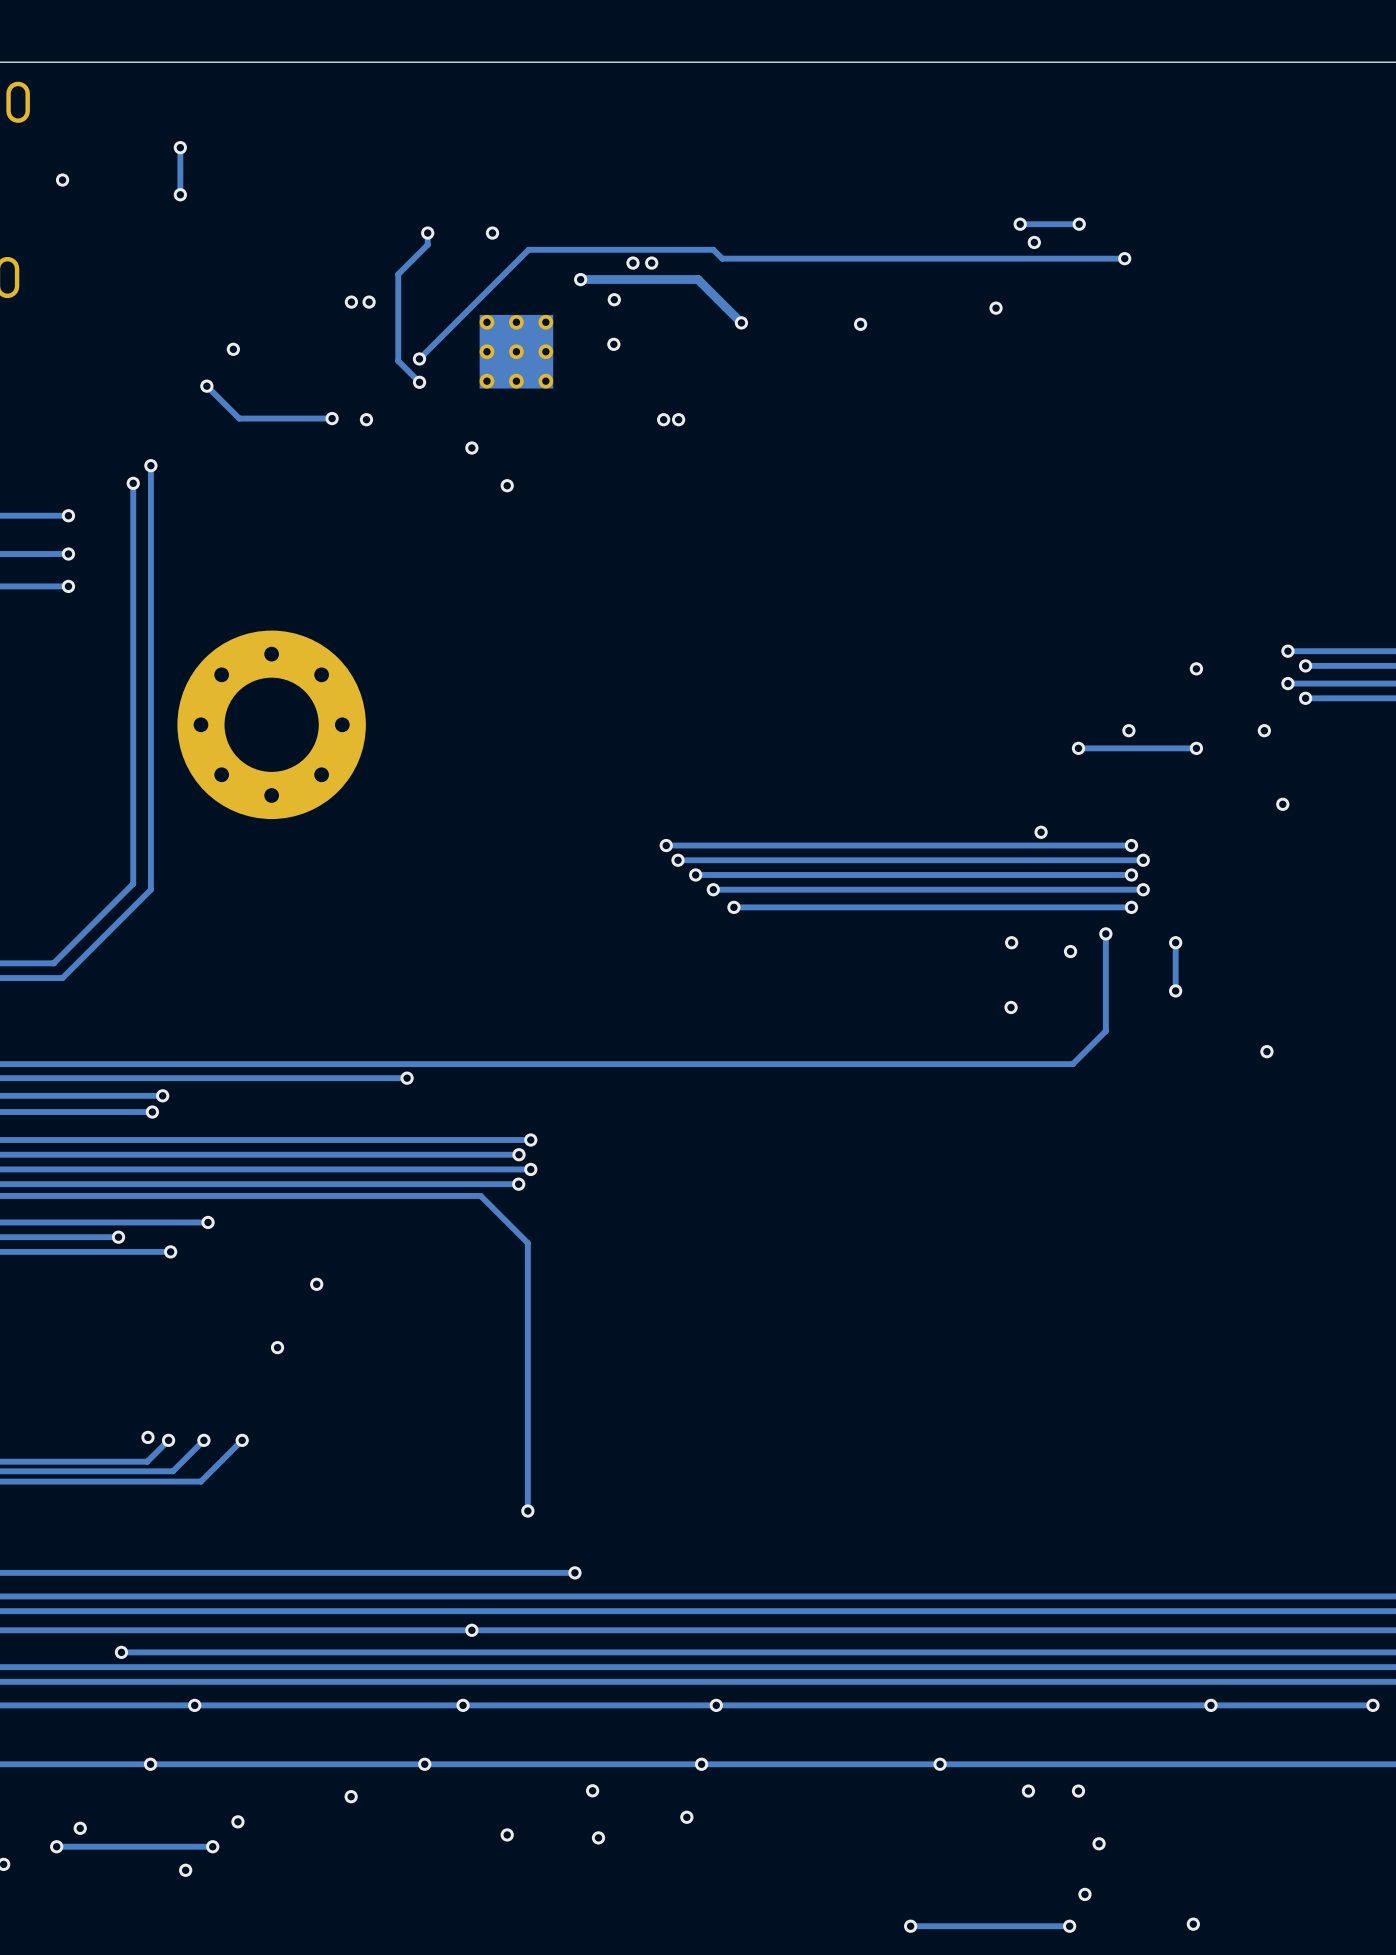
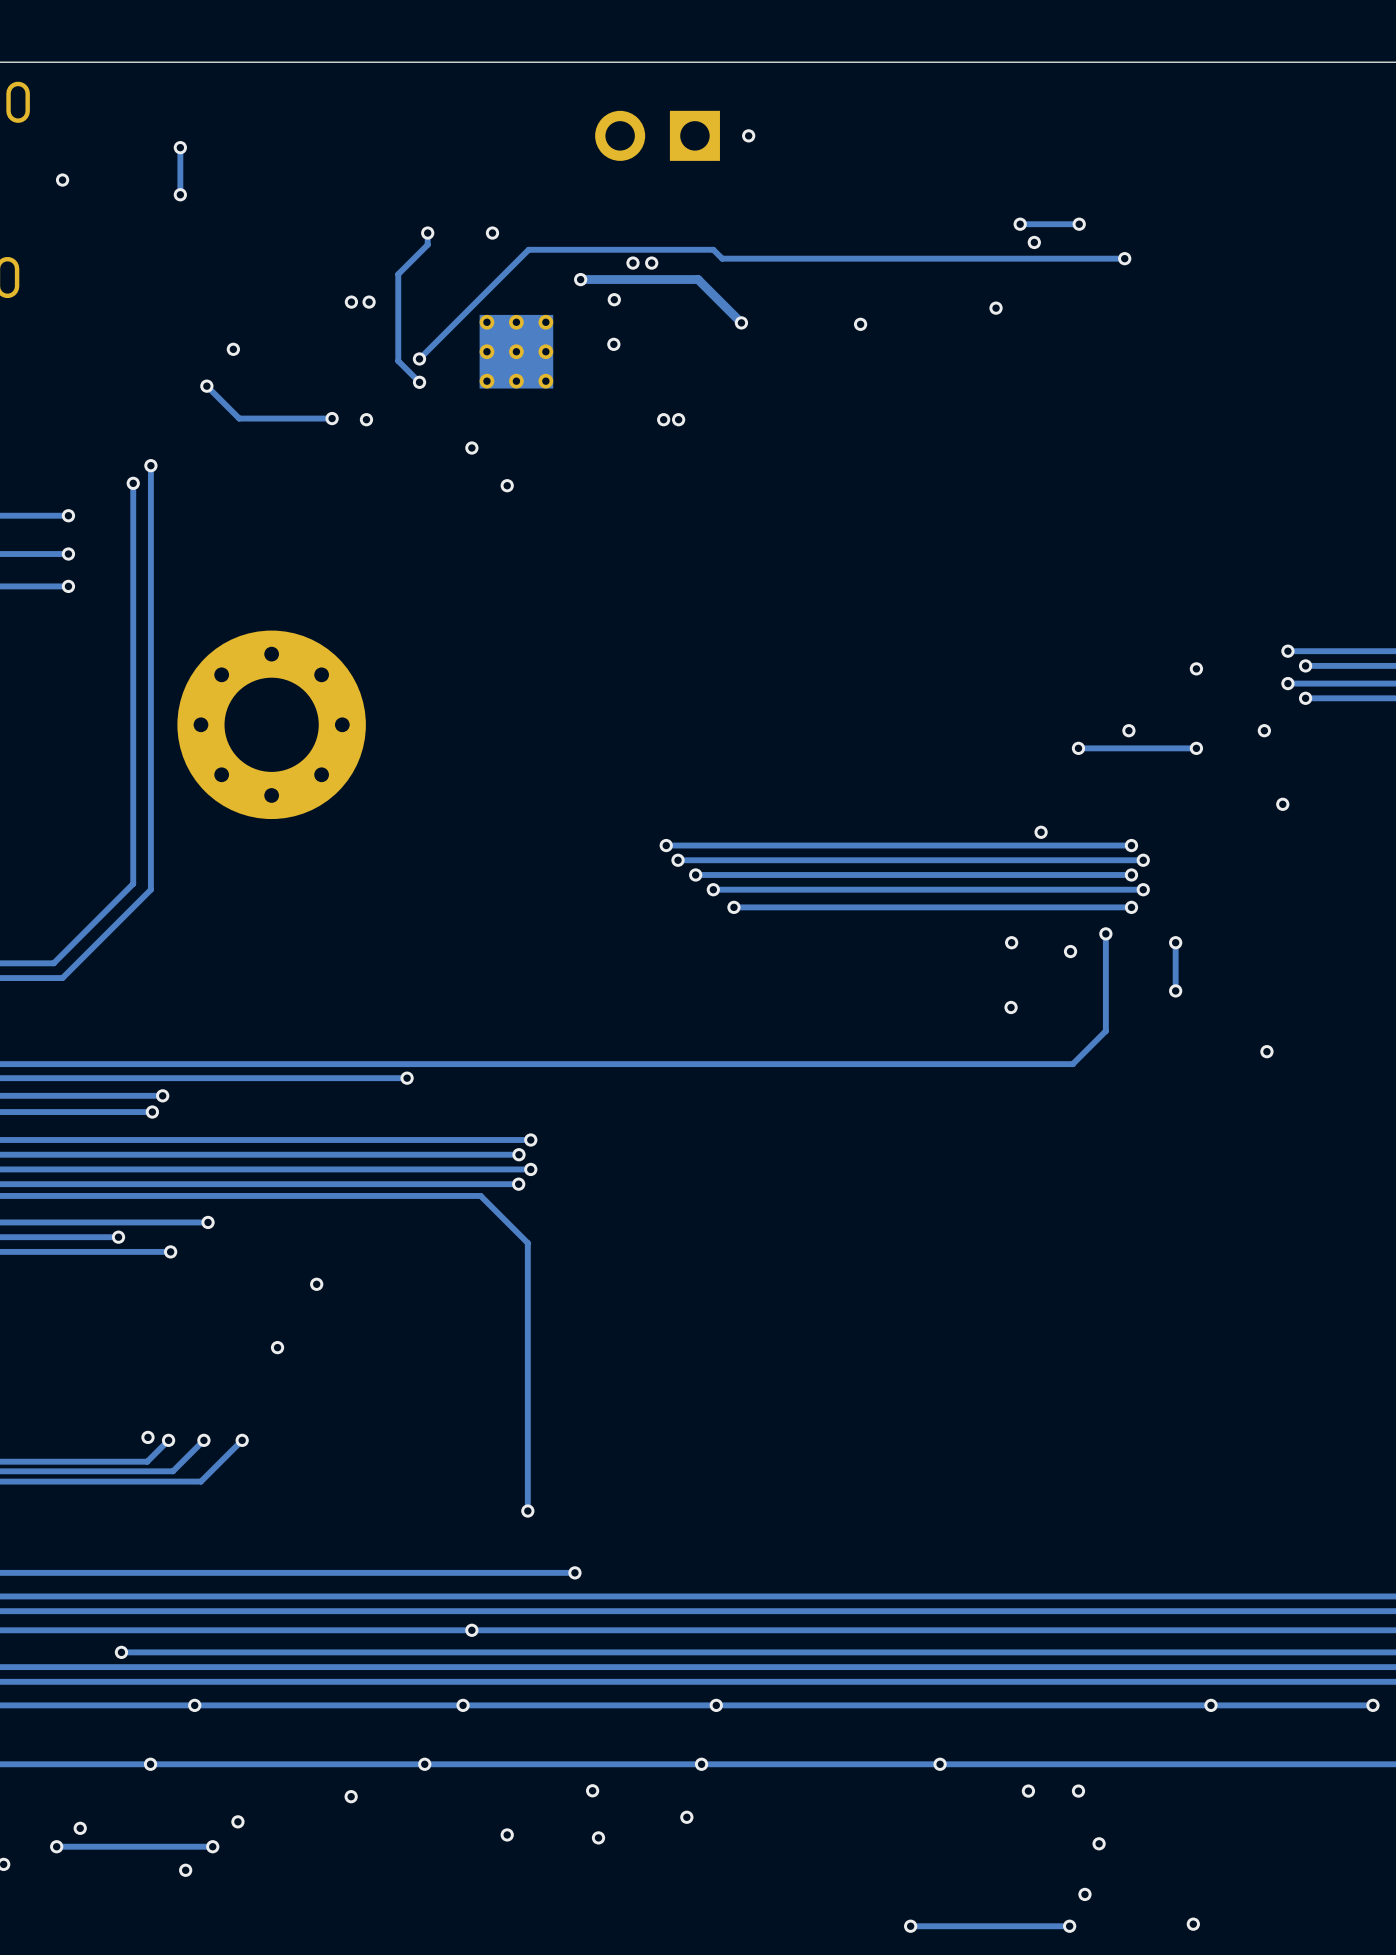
part: none -> (657, 135)
via: none -> (748, 135)

